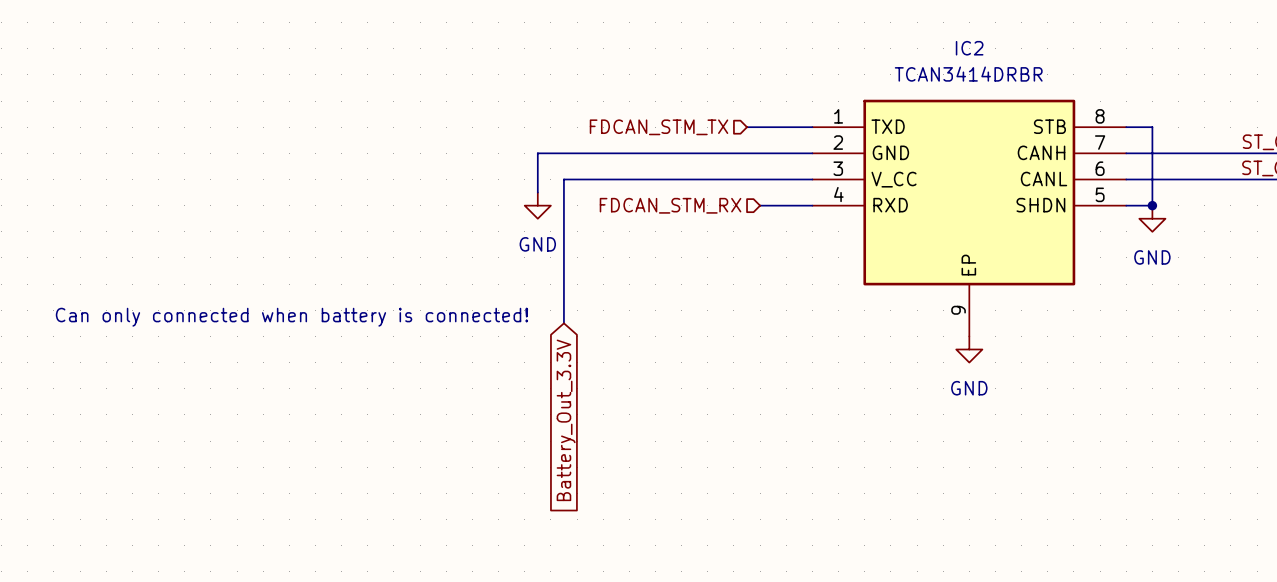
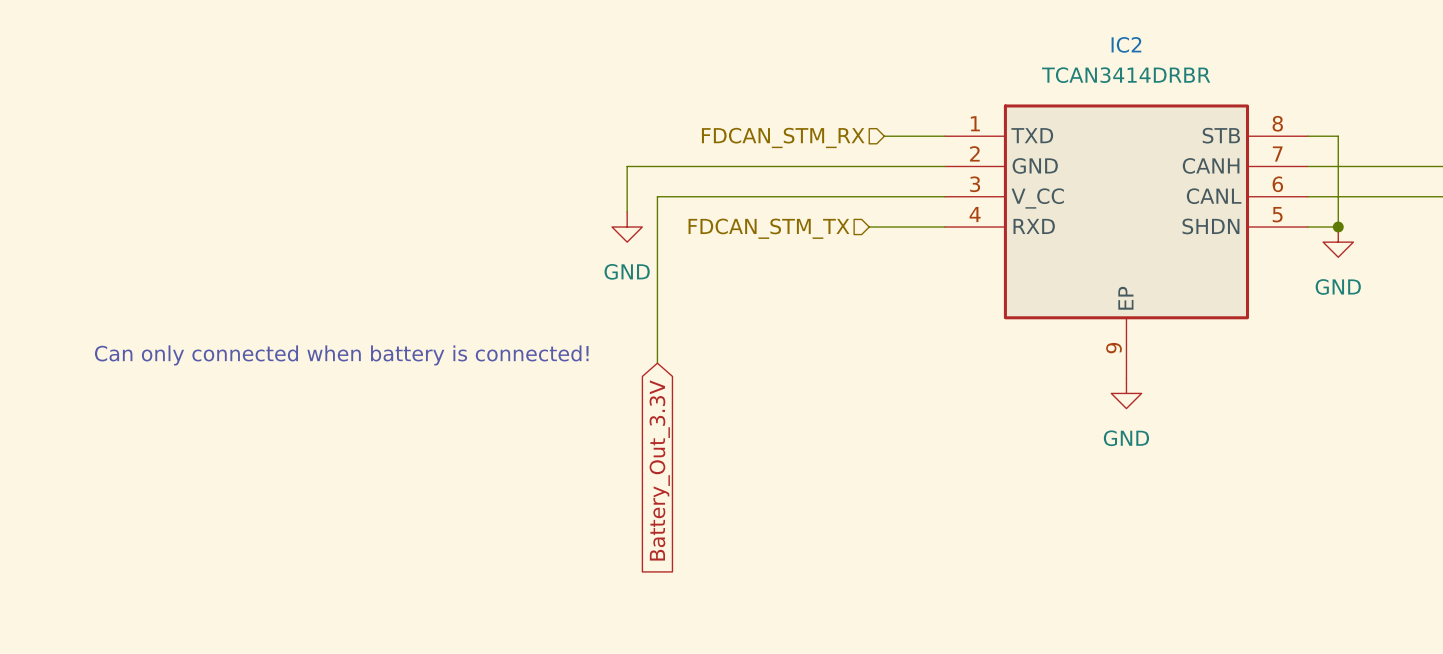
hierarchical label position: FDCAN_STM_TX (659, 127) -> FDCAN_STM_TX (768, 228)
wire: (747, 127) (760, 127) -> (869, 227) (884, 227)
hierarchical label position: FDCAN_STM_RX (670, 205) -> FDCAN_STM_RX (783, 137)

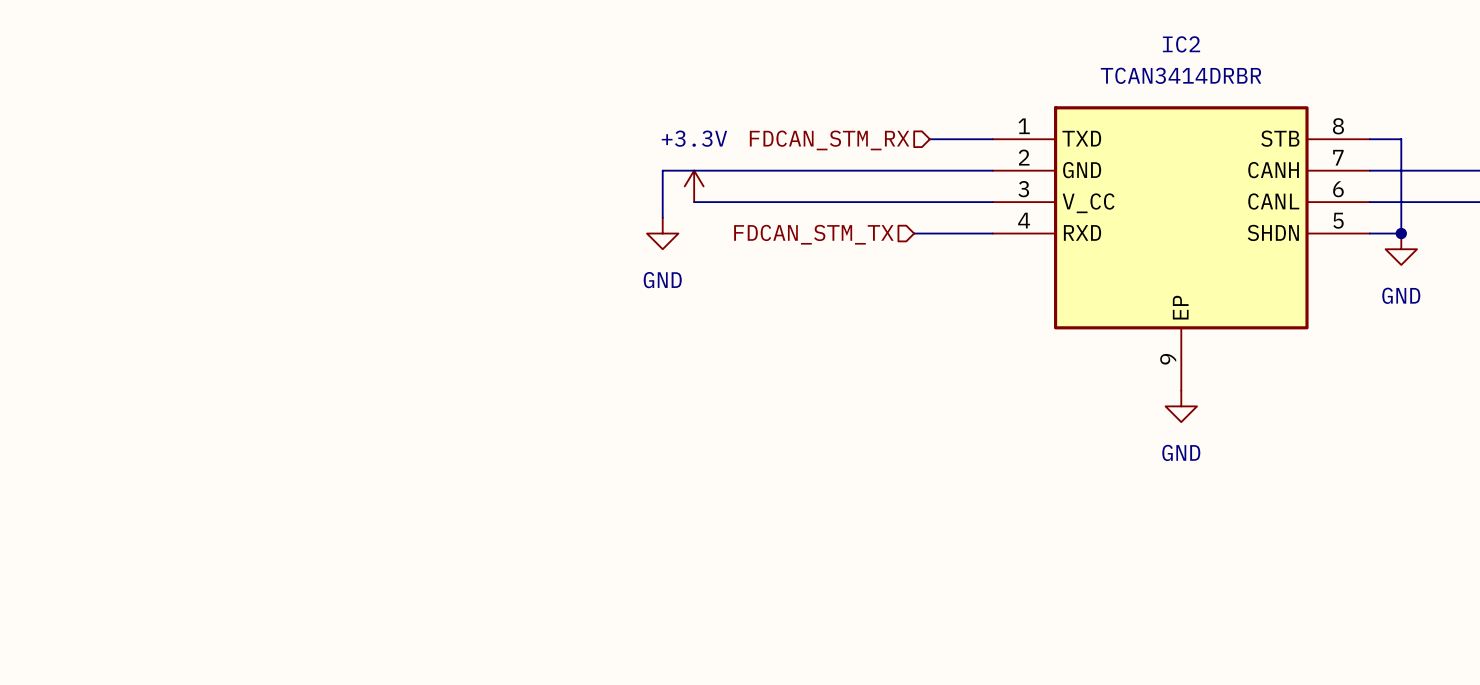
power symbol: none -> +3.3V (694, 186)
wire: (657, 196) (657, 363) -> none
text: Can only connected when battery is connected! (341, 355) -> none
global label: Battery_Out_3.3V (659, 470) -> none

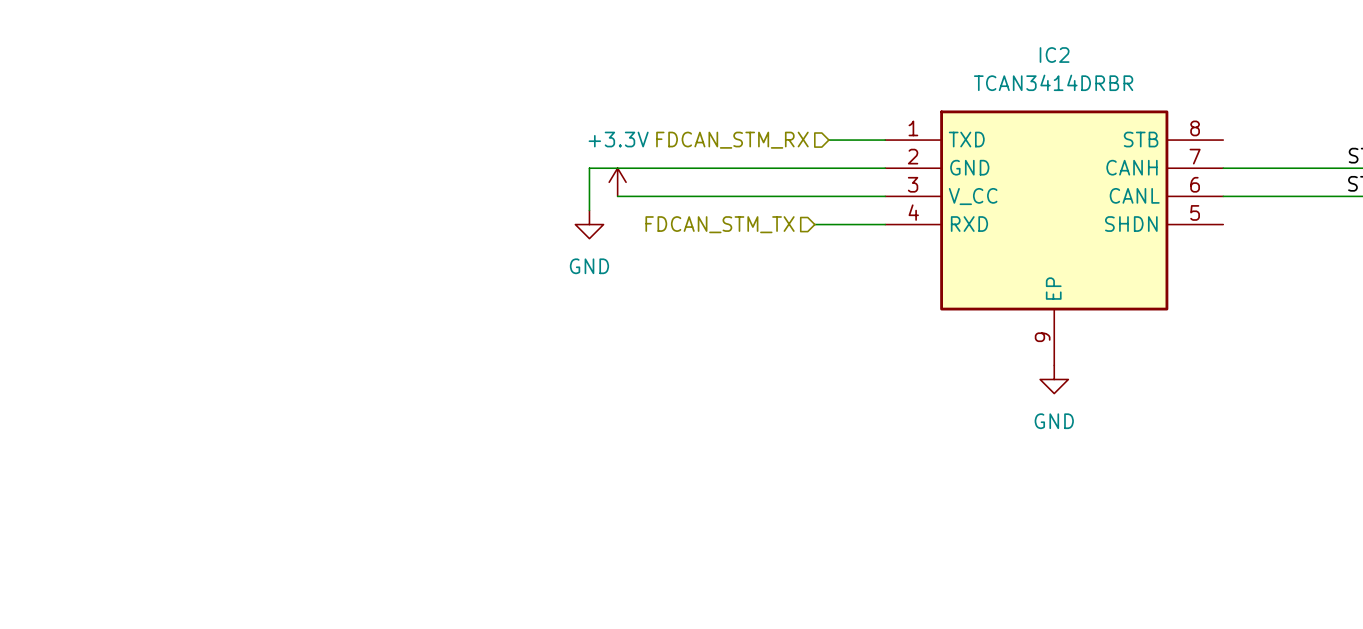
wire: (1369, 139) (1401, 139) (1401, 233) (1369, 233) -> none
junction: (1401, 233) -> none
power symbol: GND (1401, 249) -> none

